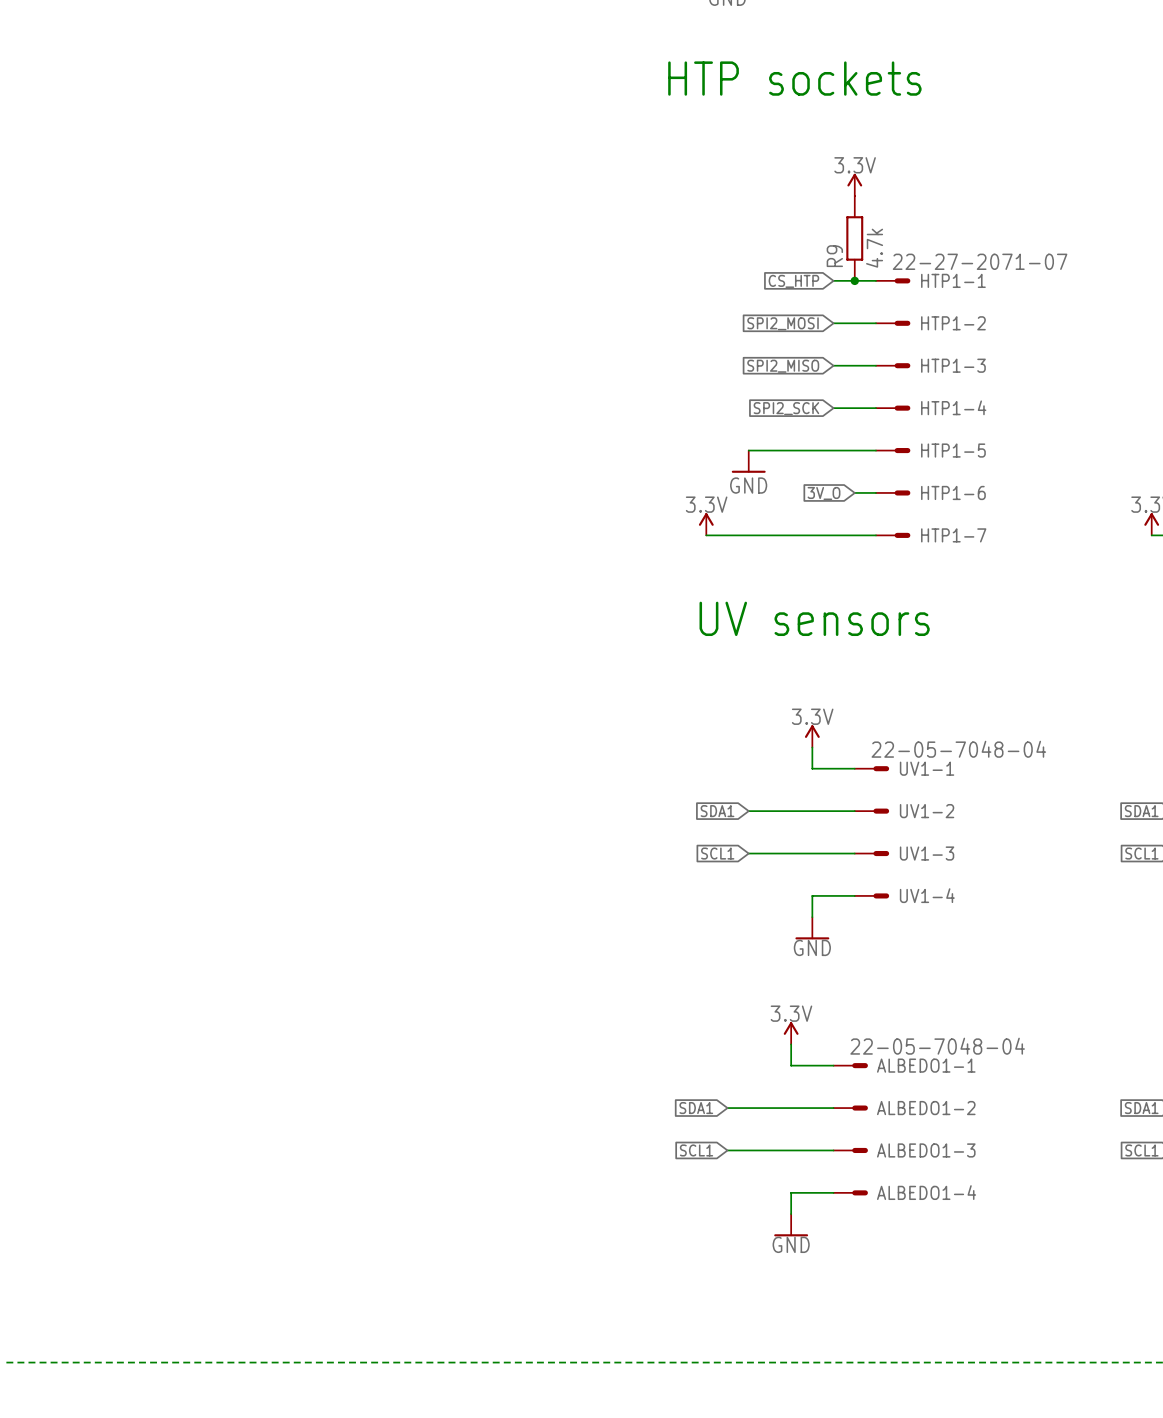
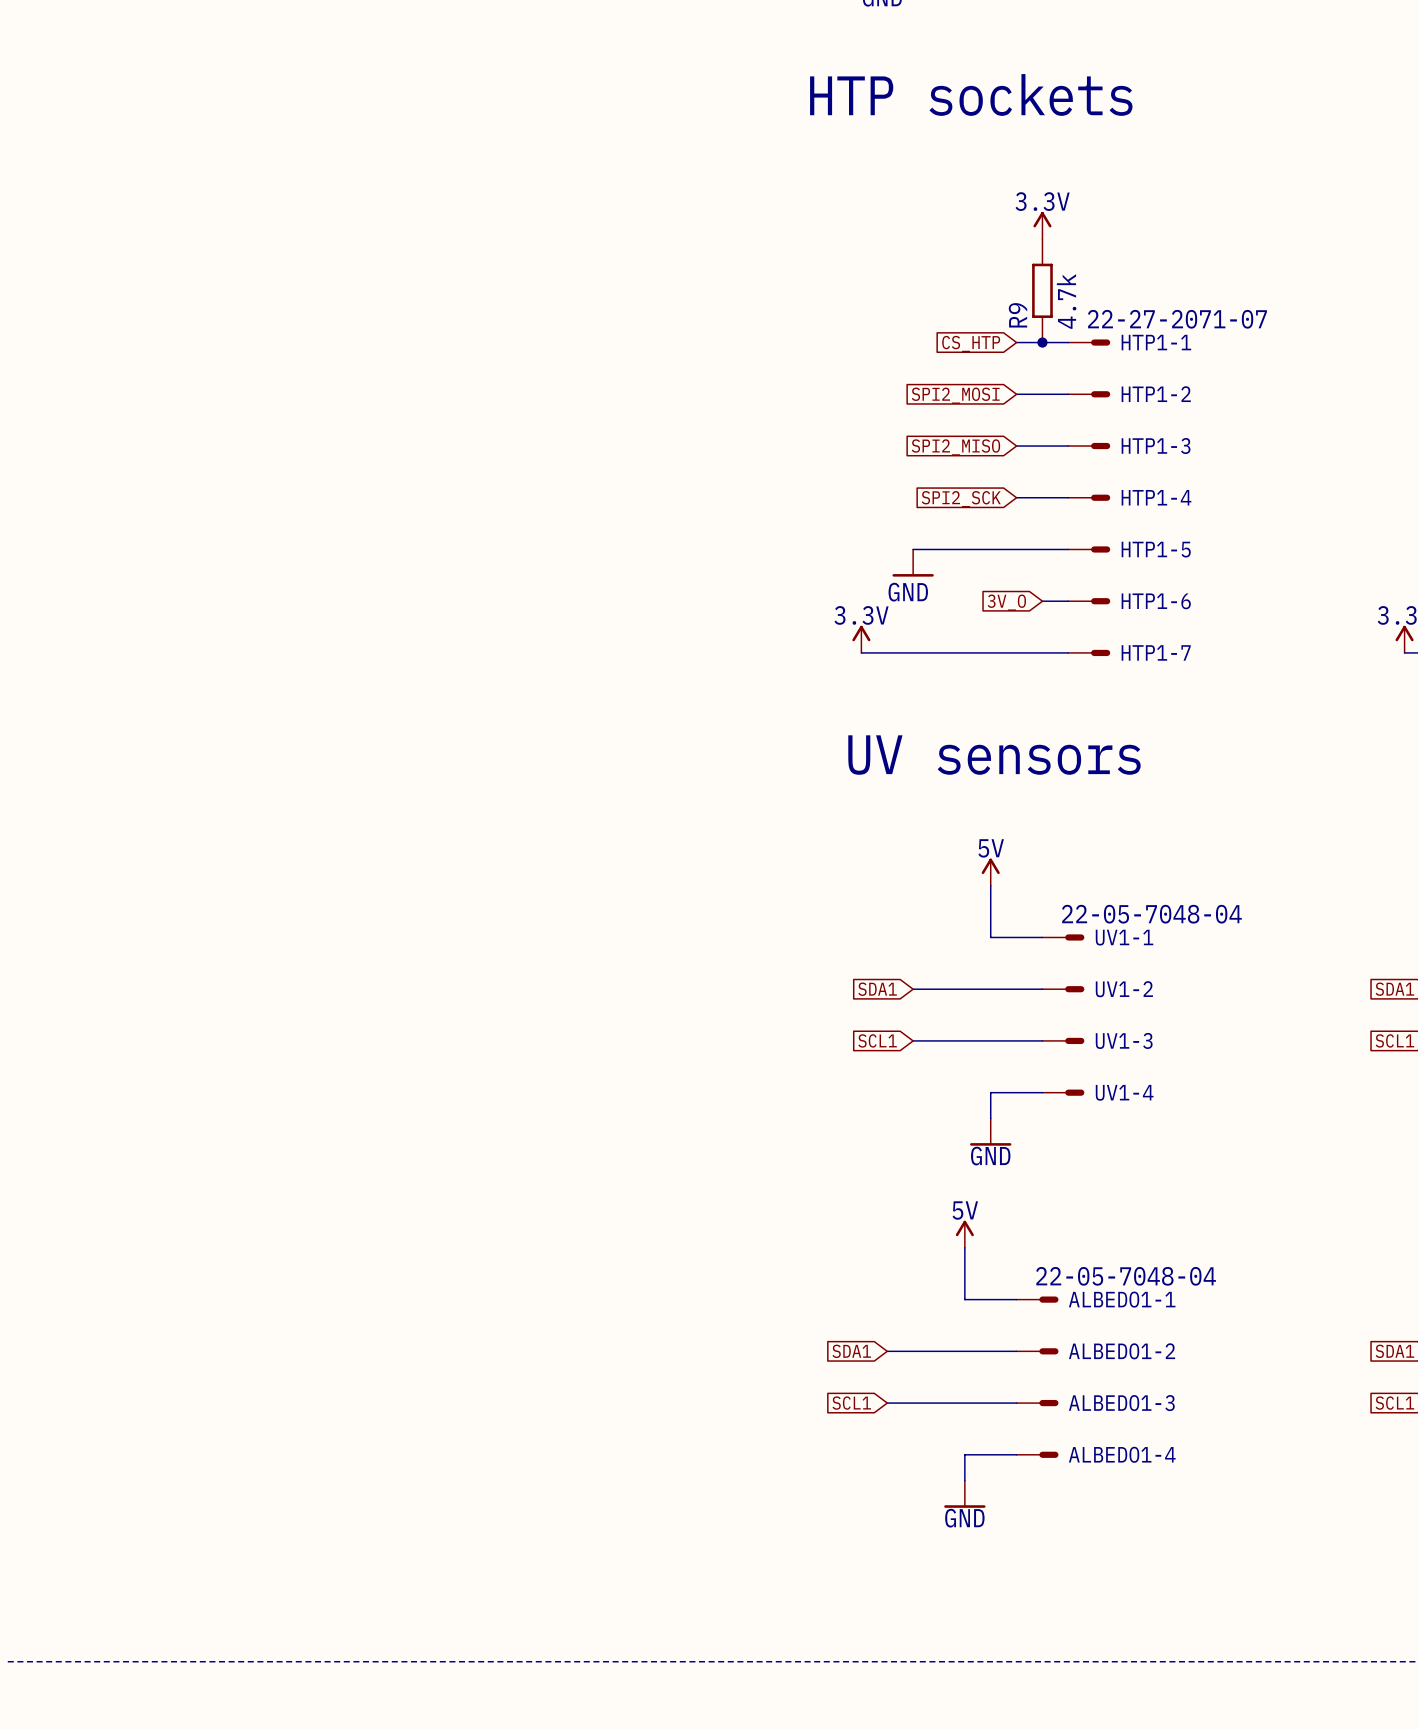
power symbol: none -> 5V (990, 872)
power symbol: 3.3V (812, 736) -> none
power symbol: none -> 5V (964, 1234)
power symbol: 3.3V (791, 1033) -> none

